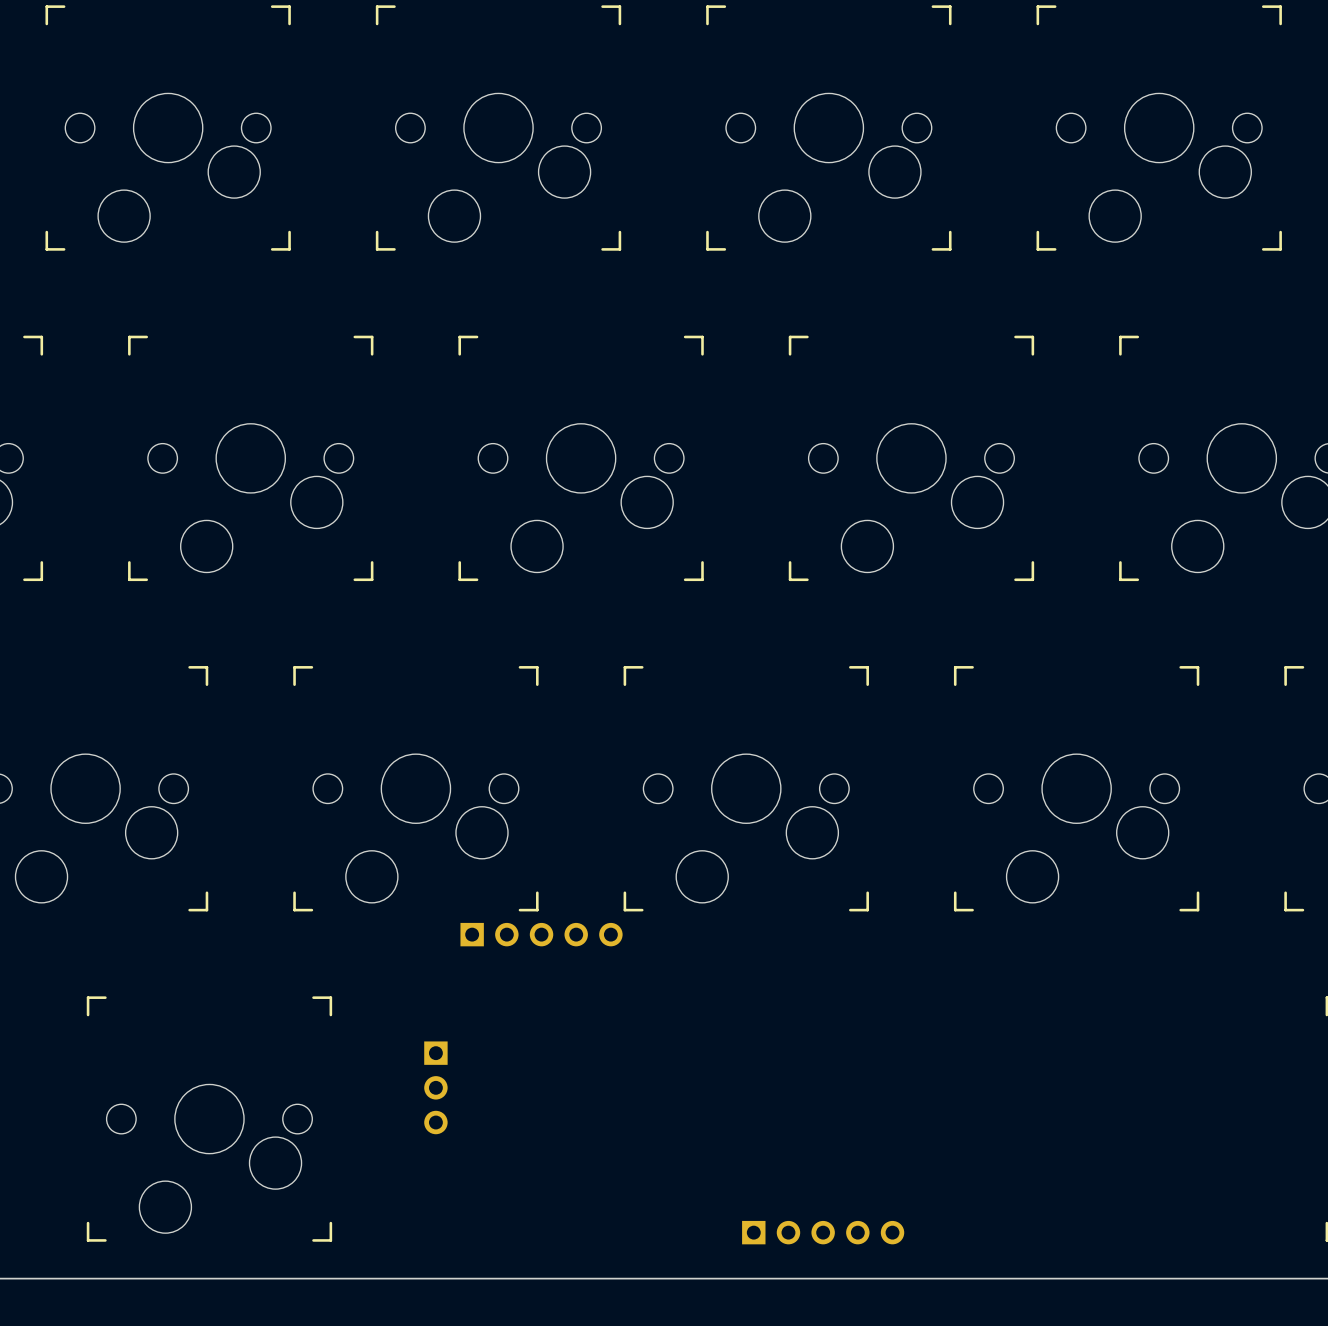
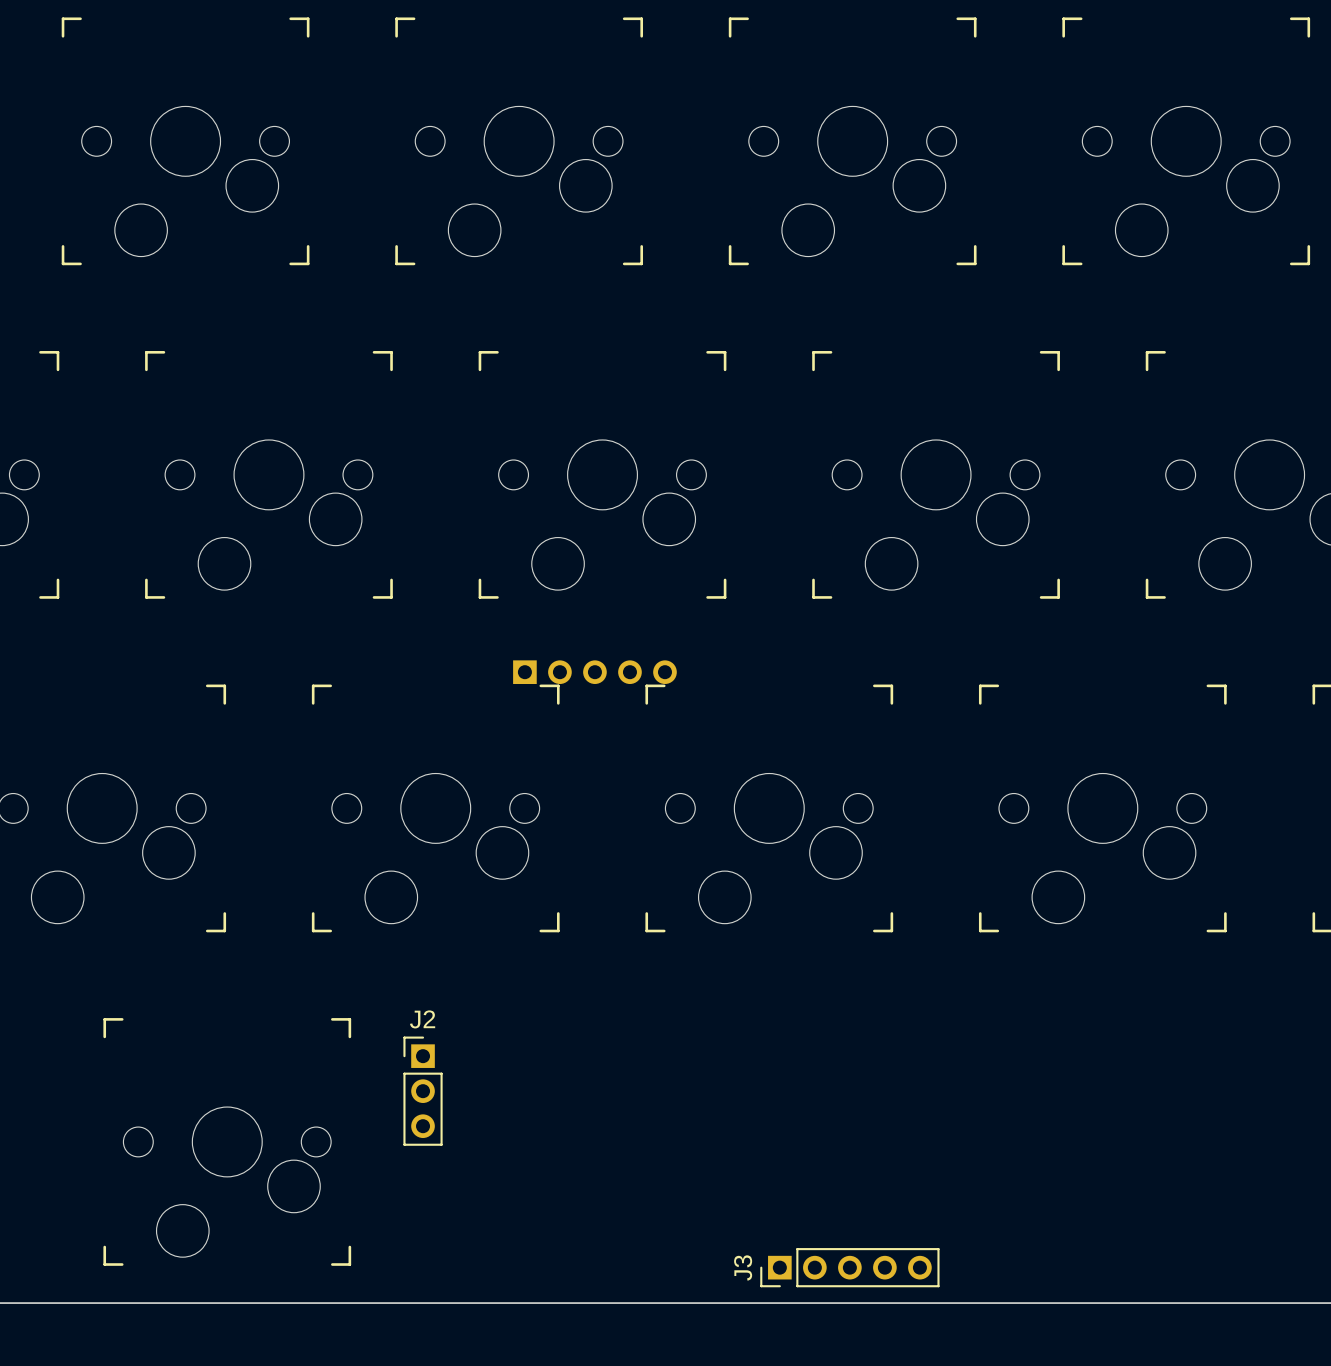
part position: (541, 934) -> (594, 672)
J2 side: bottom (435, 1087) -> top (423, 1091)
J3 side: bottom (823, 1232) -> top (849, 1267)

